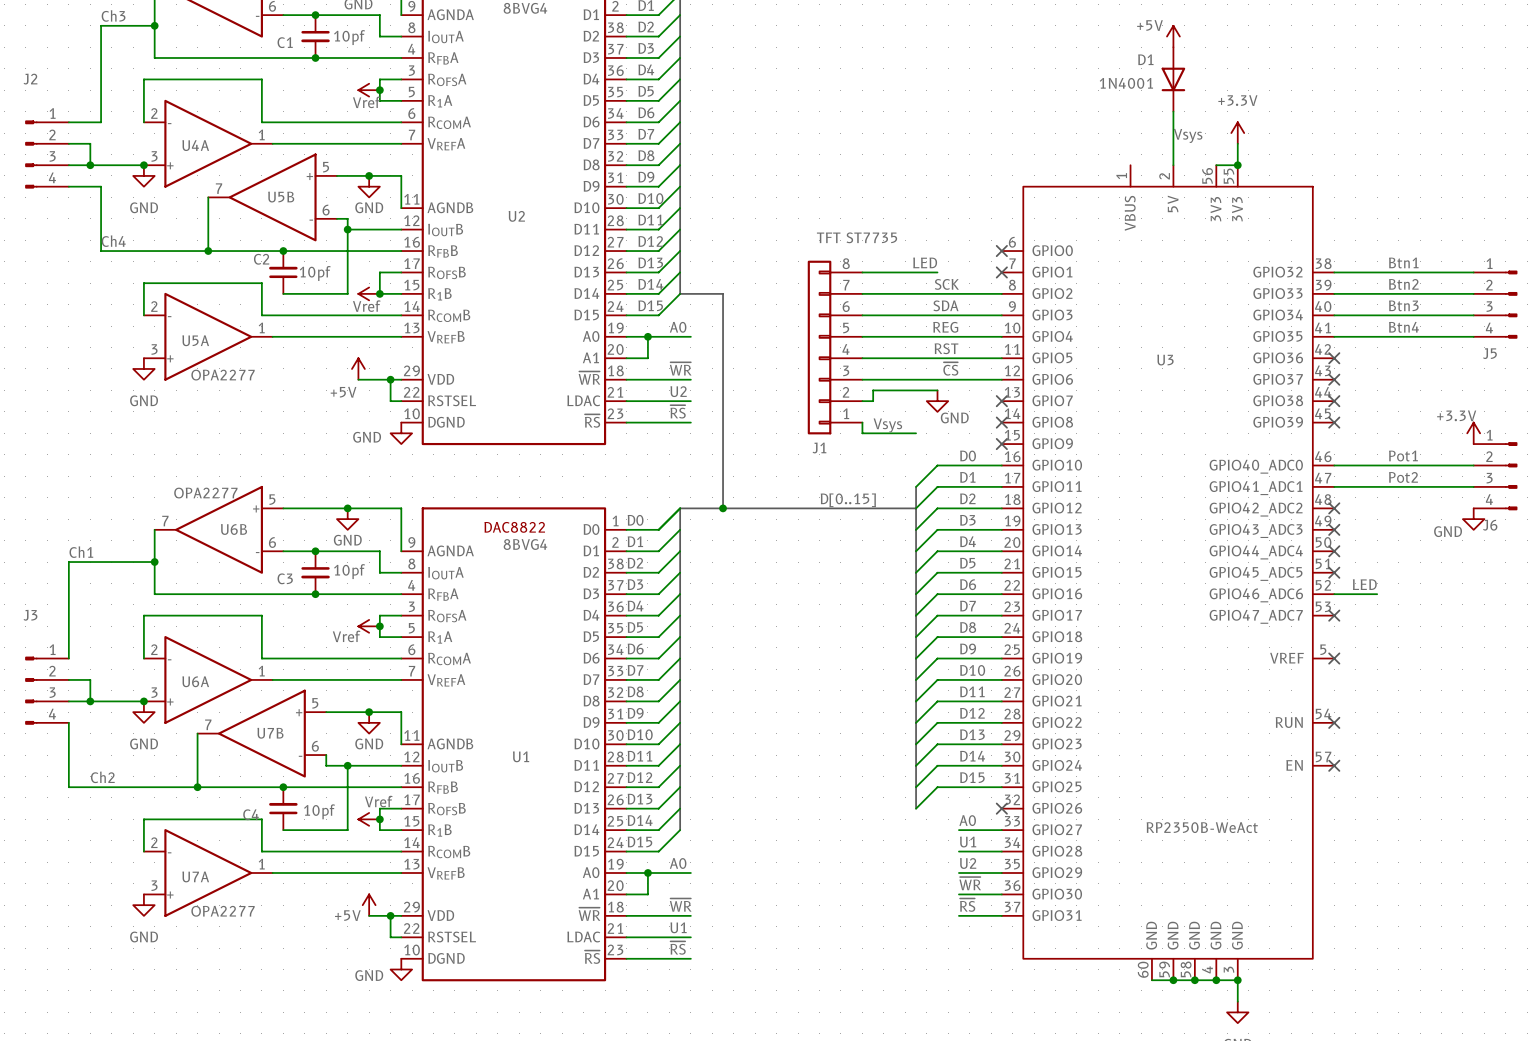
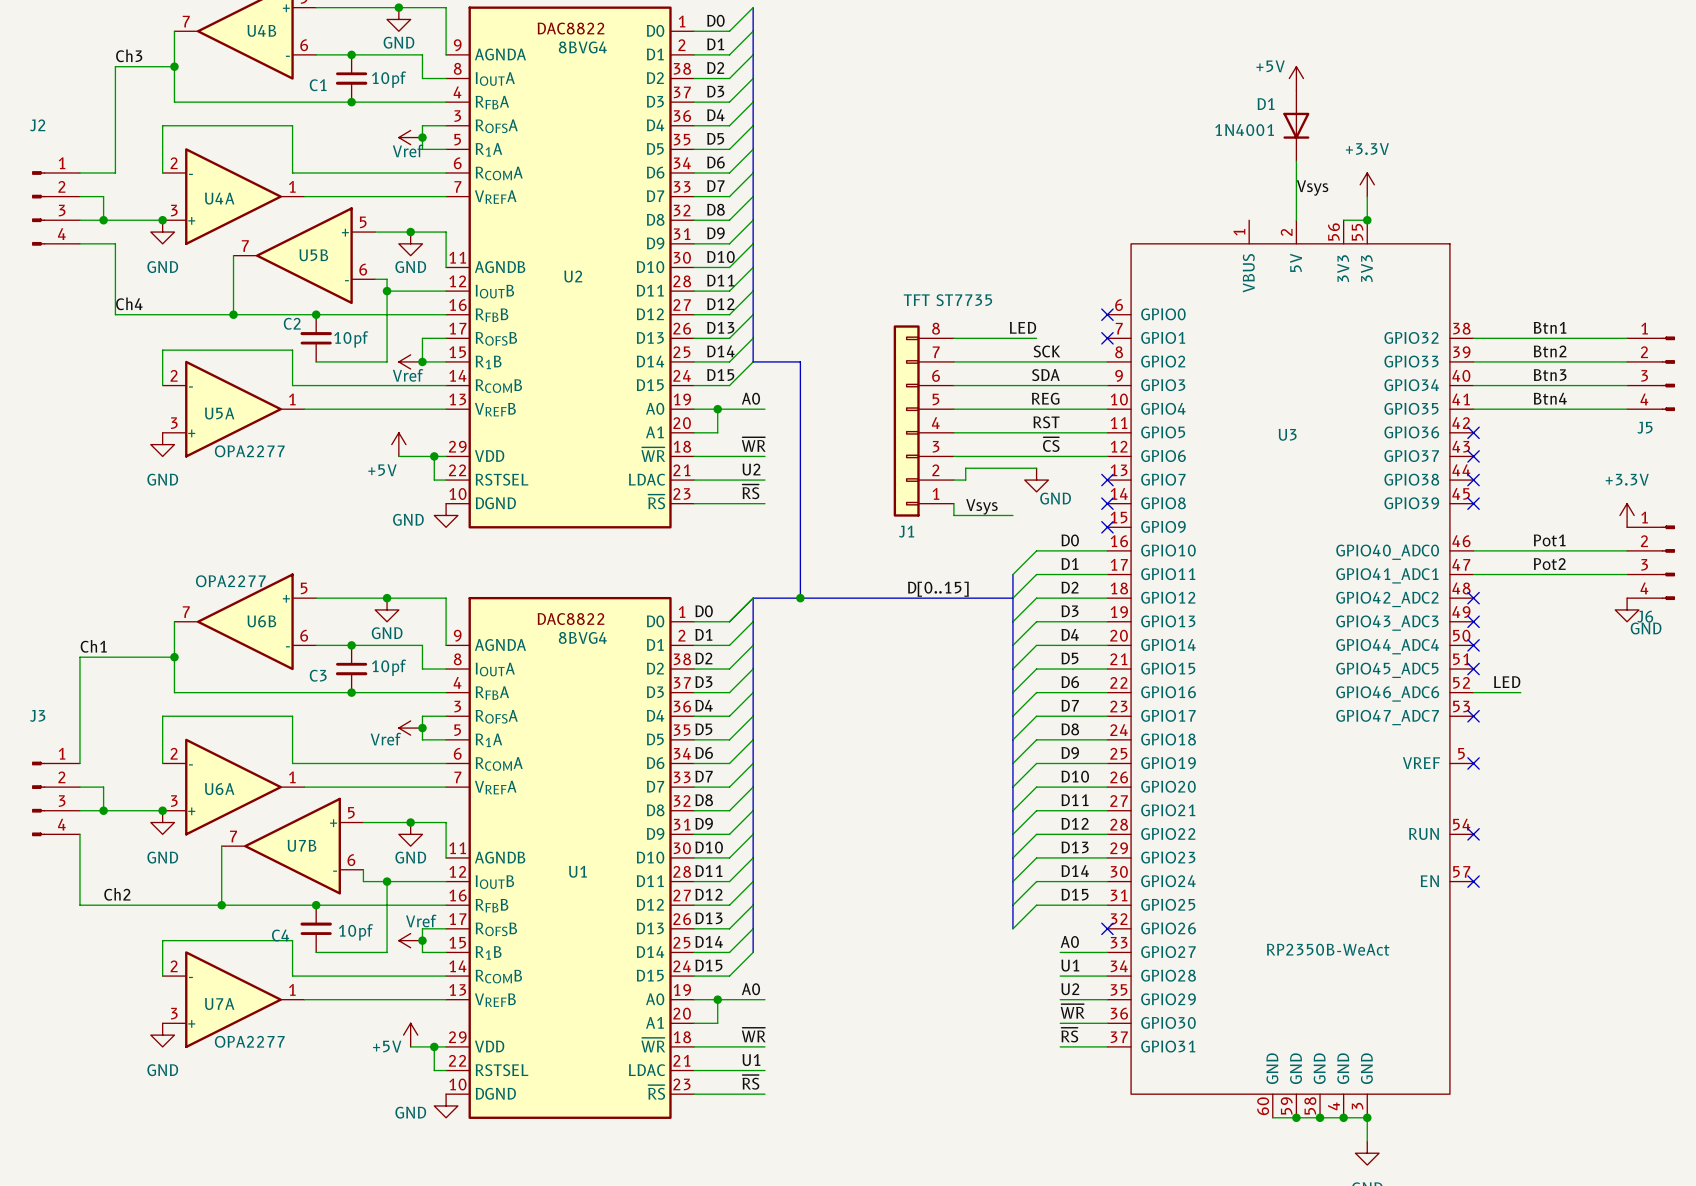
power symbol text position: +3.3V (1456, 415) -> +3.3V (1627, 479)
power symbol text position: GND (1448, 531) -> GND (1646, 628)

